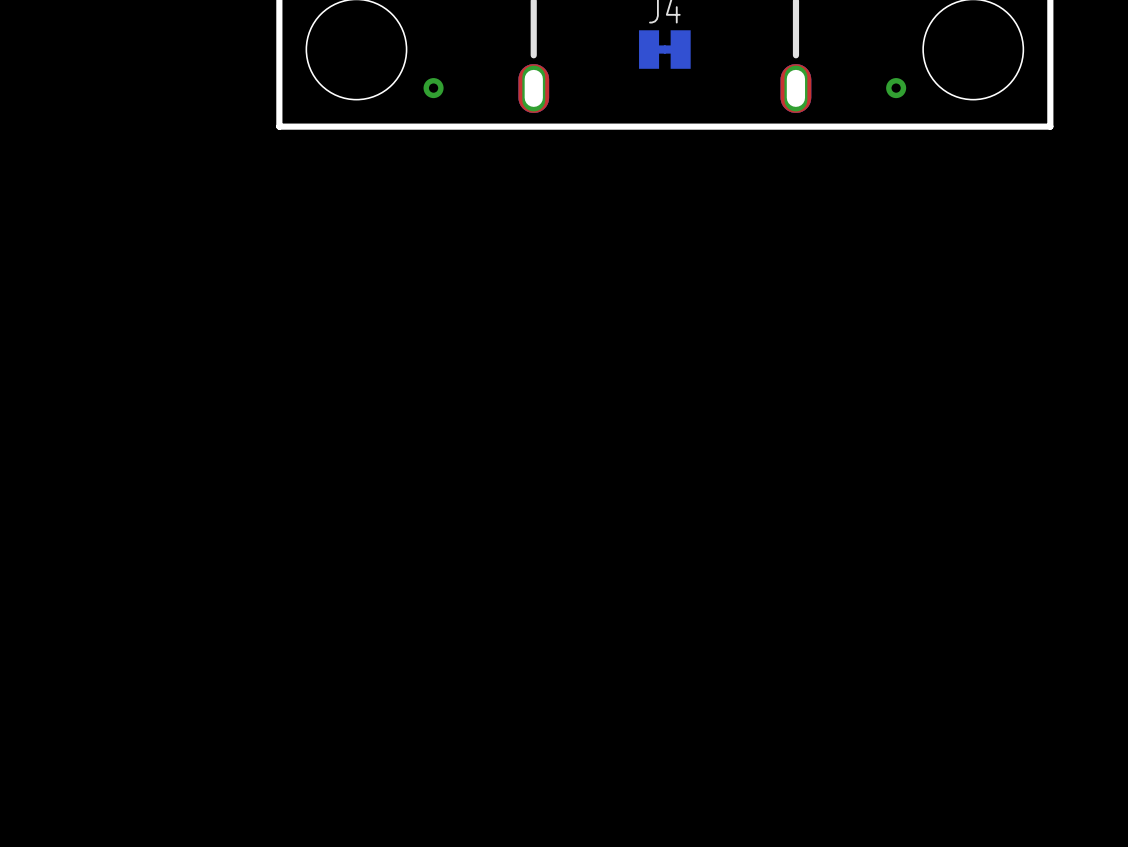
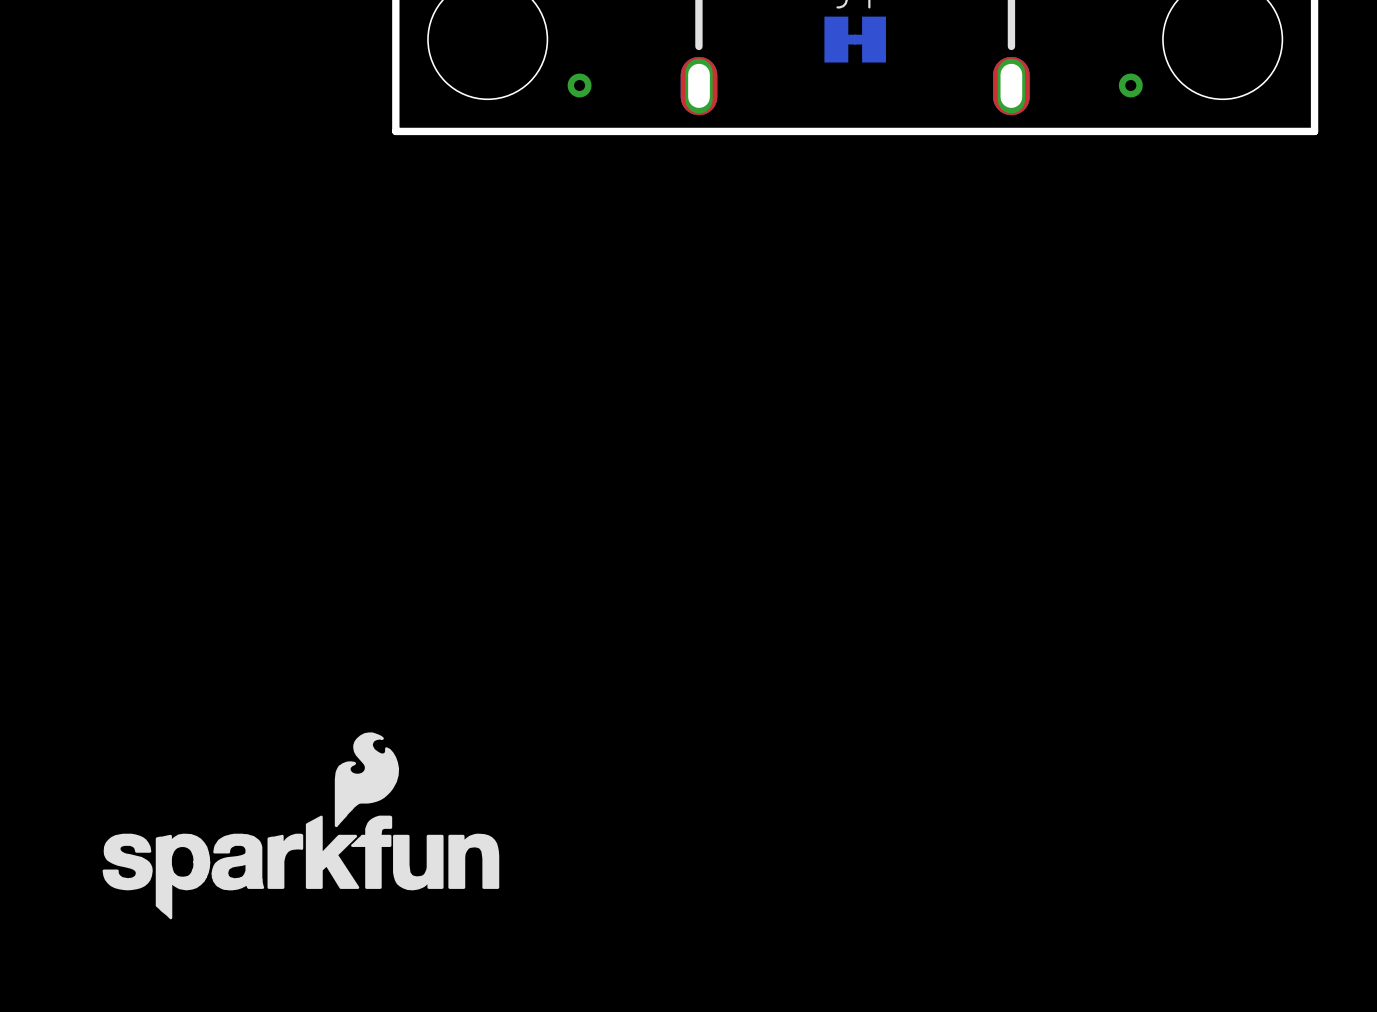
drawing: none -> [102, 732, 500, 920]

